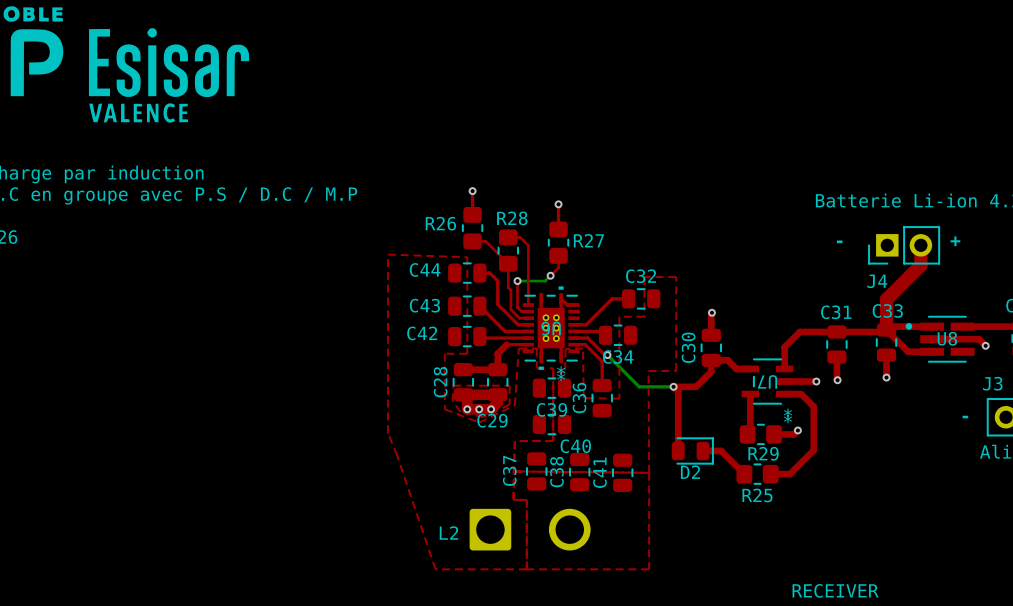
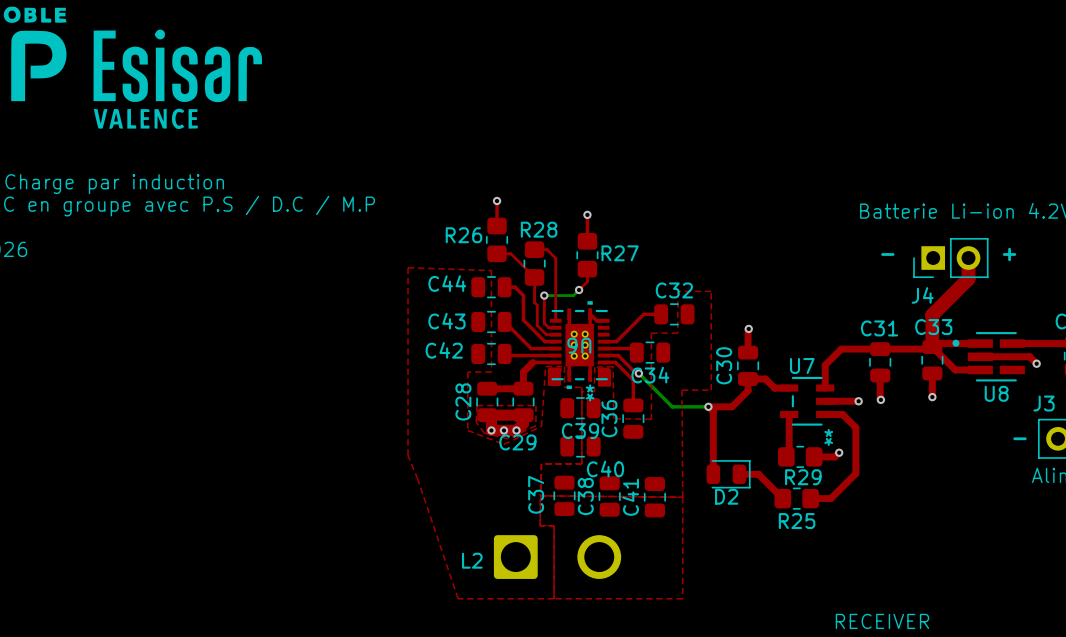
U8 name position: U8 (947, 338) -> U8 (996, 393)
drawing: none -> [547, 367, 562, 387]
drawing: none -> [597, 368, 612, 387]
U7 name rotation: 0° (767, 381) -> 180° (802, 365)
U7 name position: U7 (767, 381) -> U7 (802, 365)

